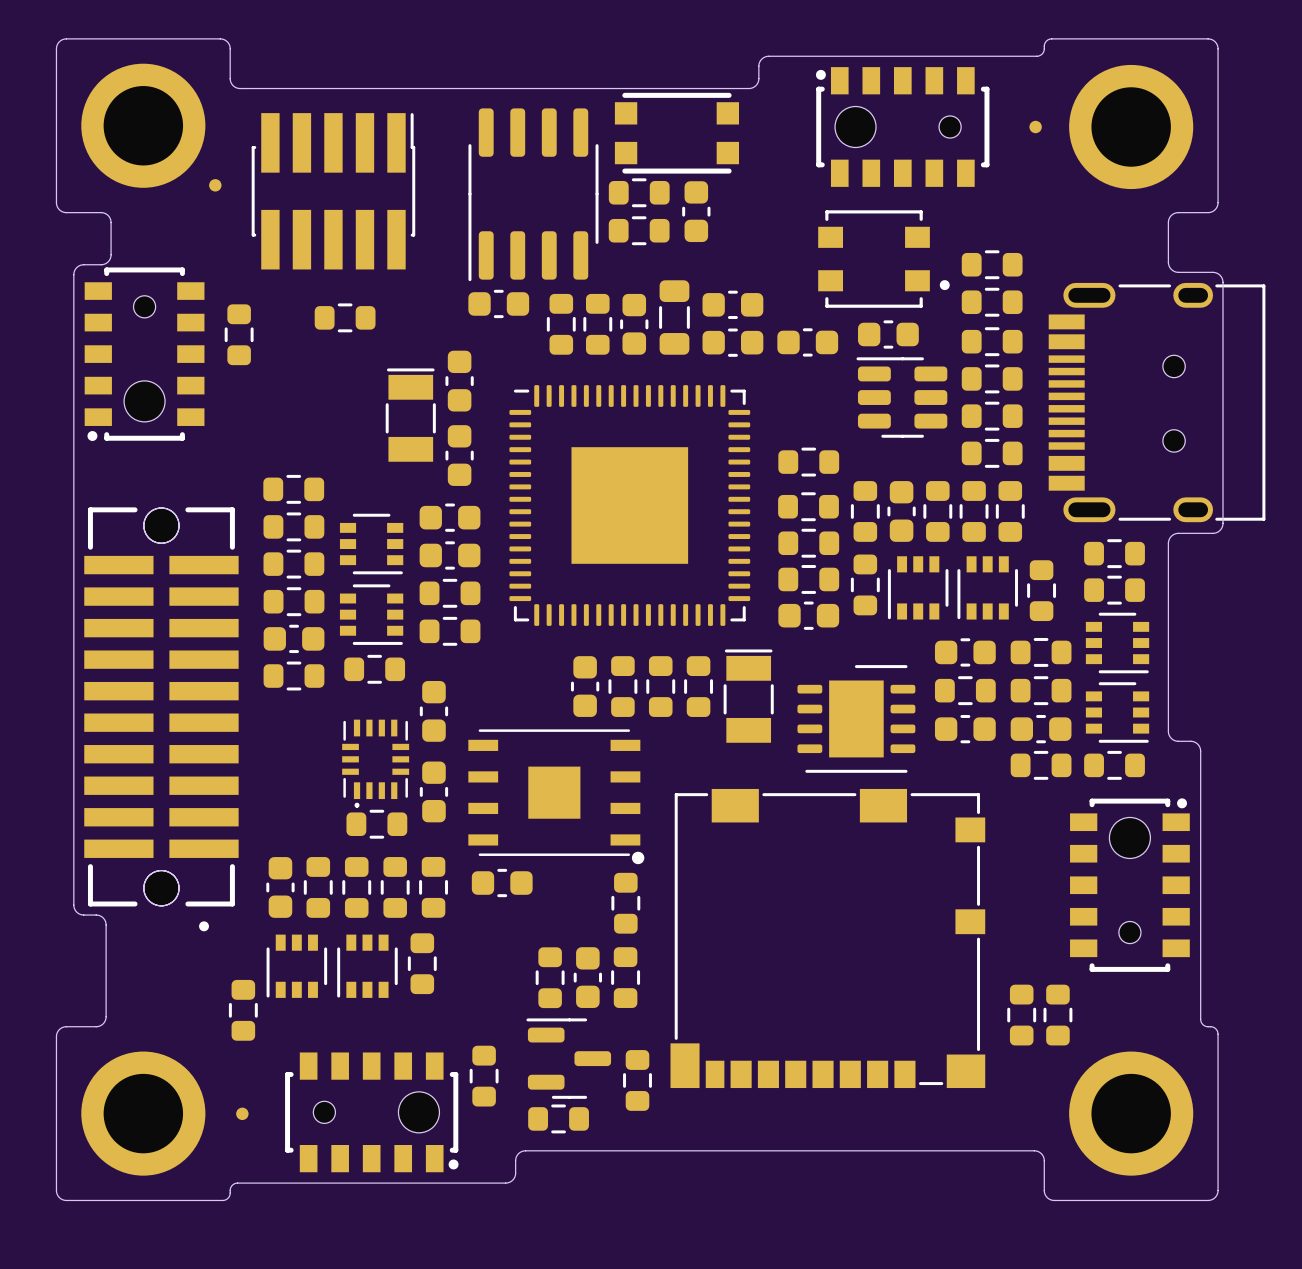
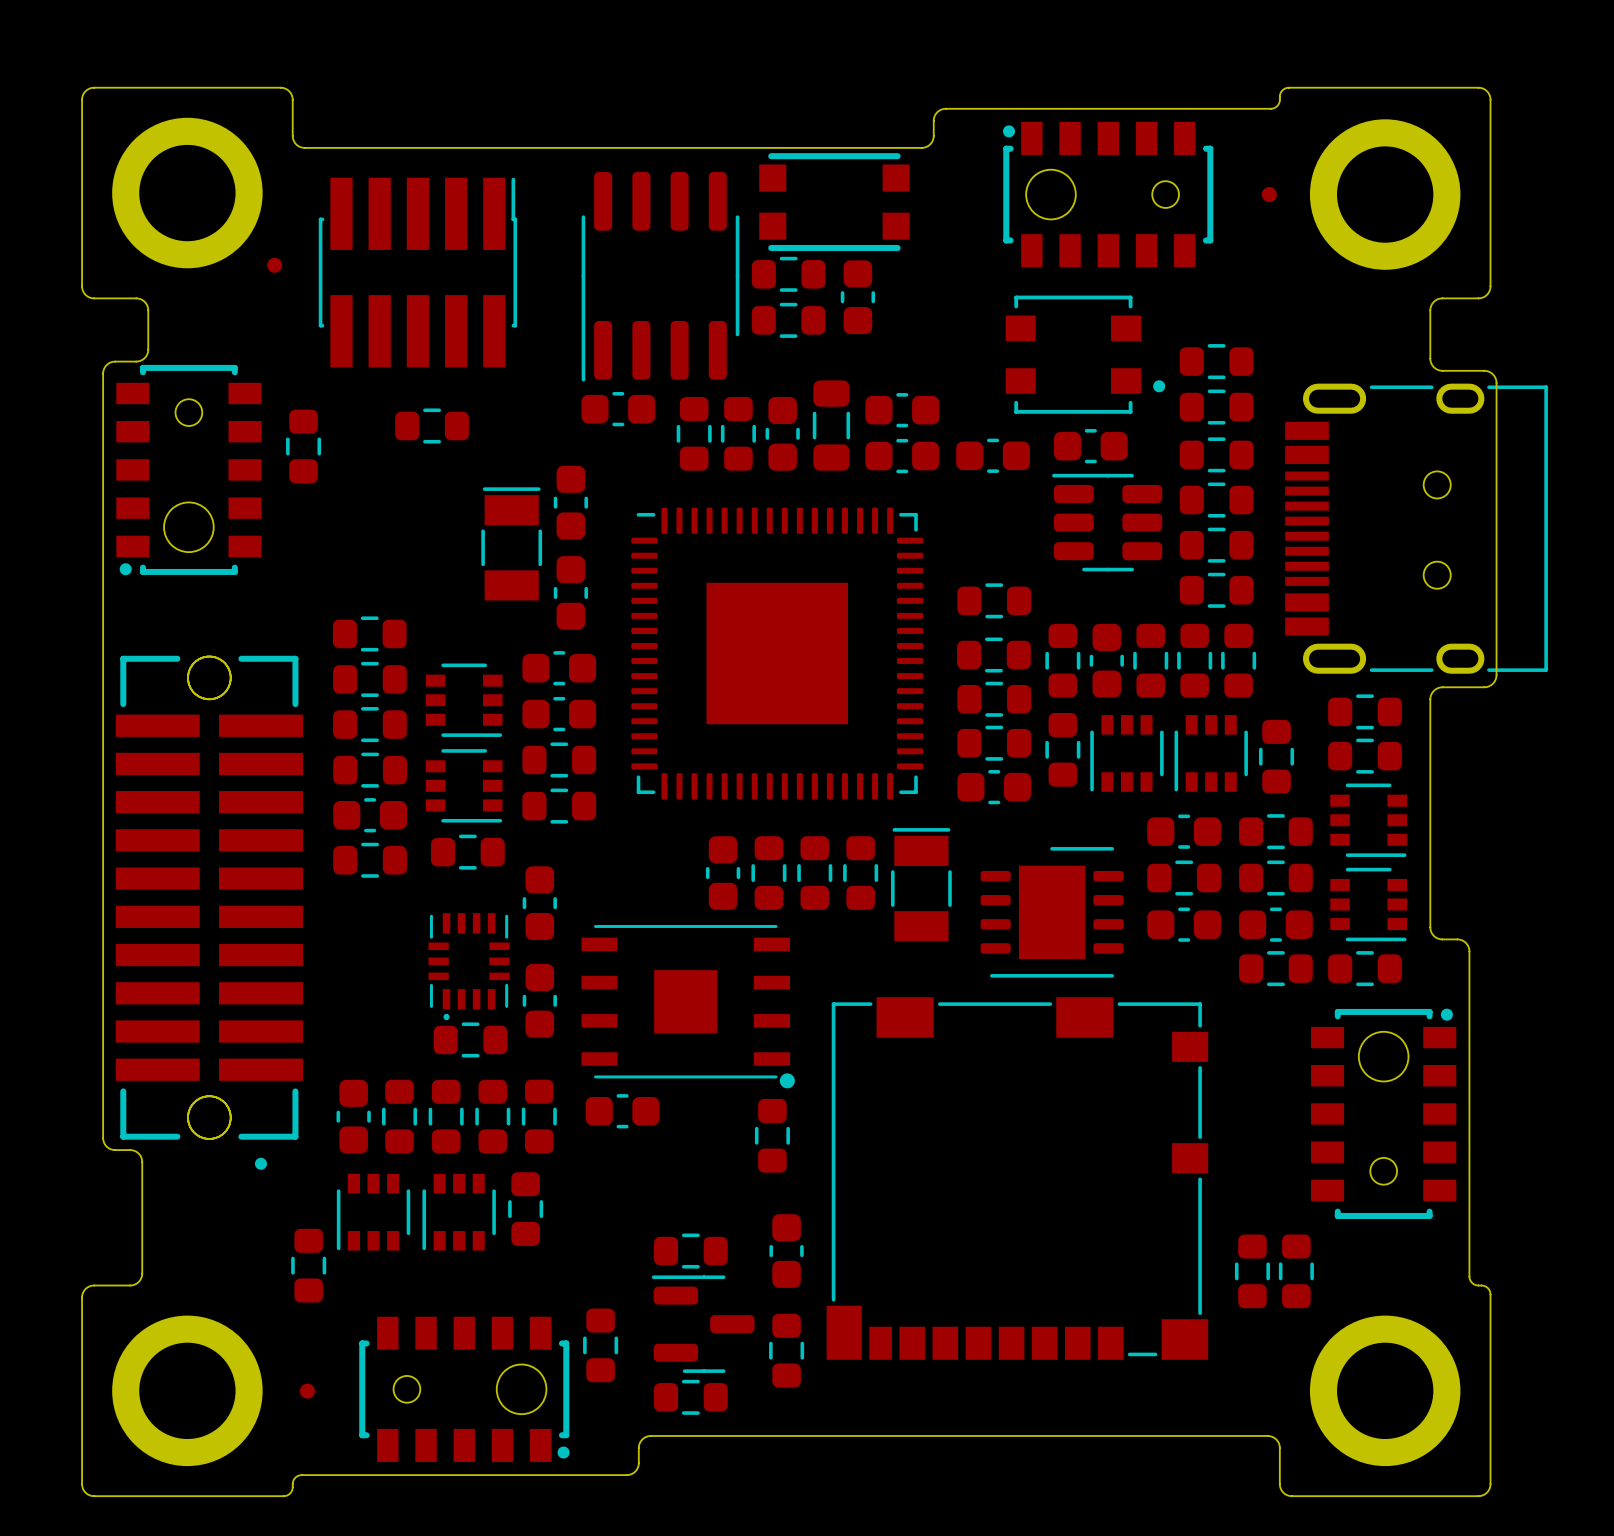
part footprint: [611, 947, 641, 1008] -> [769, 1214, 804, 1288]
part rotation: 0° (550, 977) -> 90° clockwise (690, 1251)
part: (587, 977) -> none

